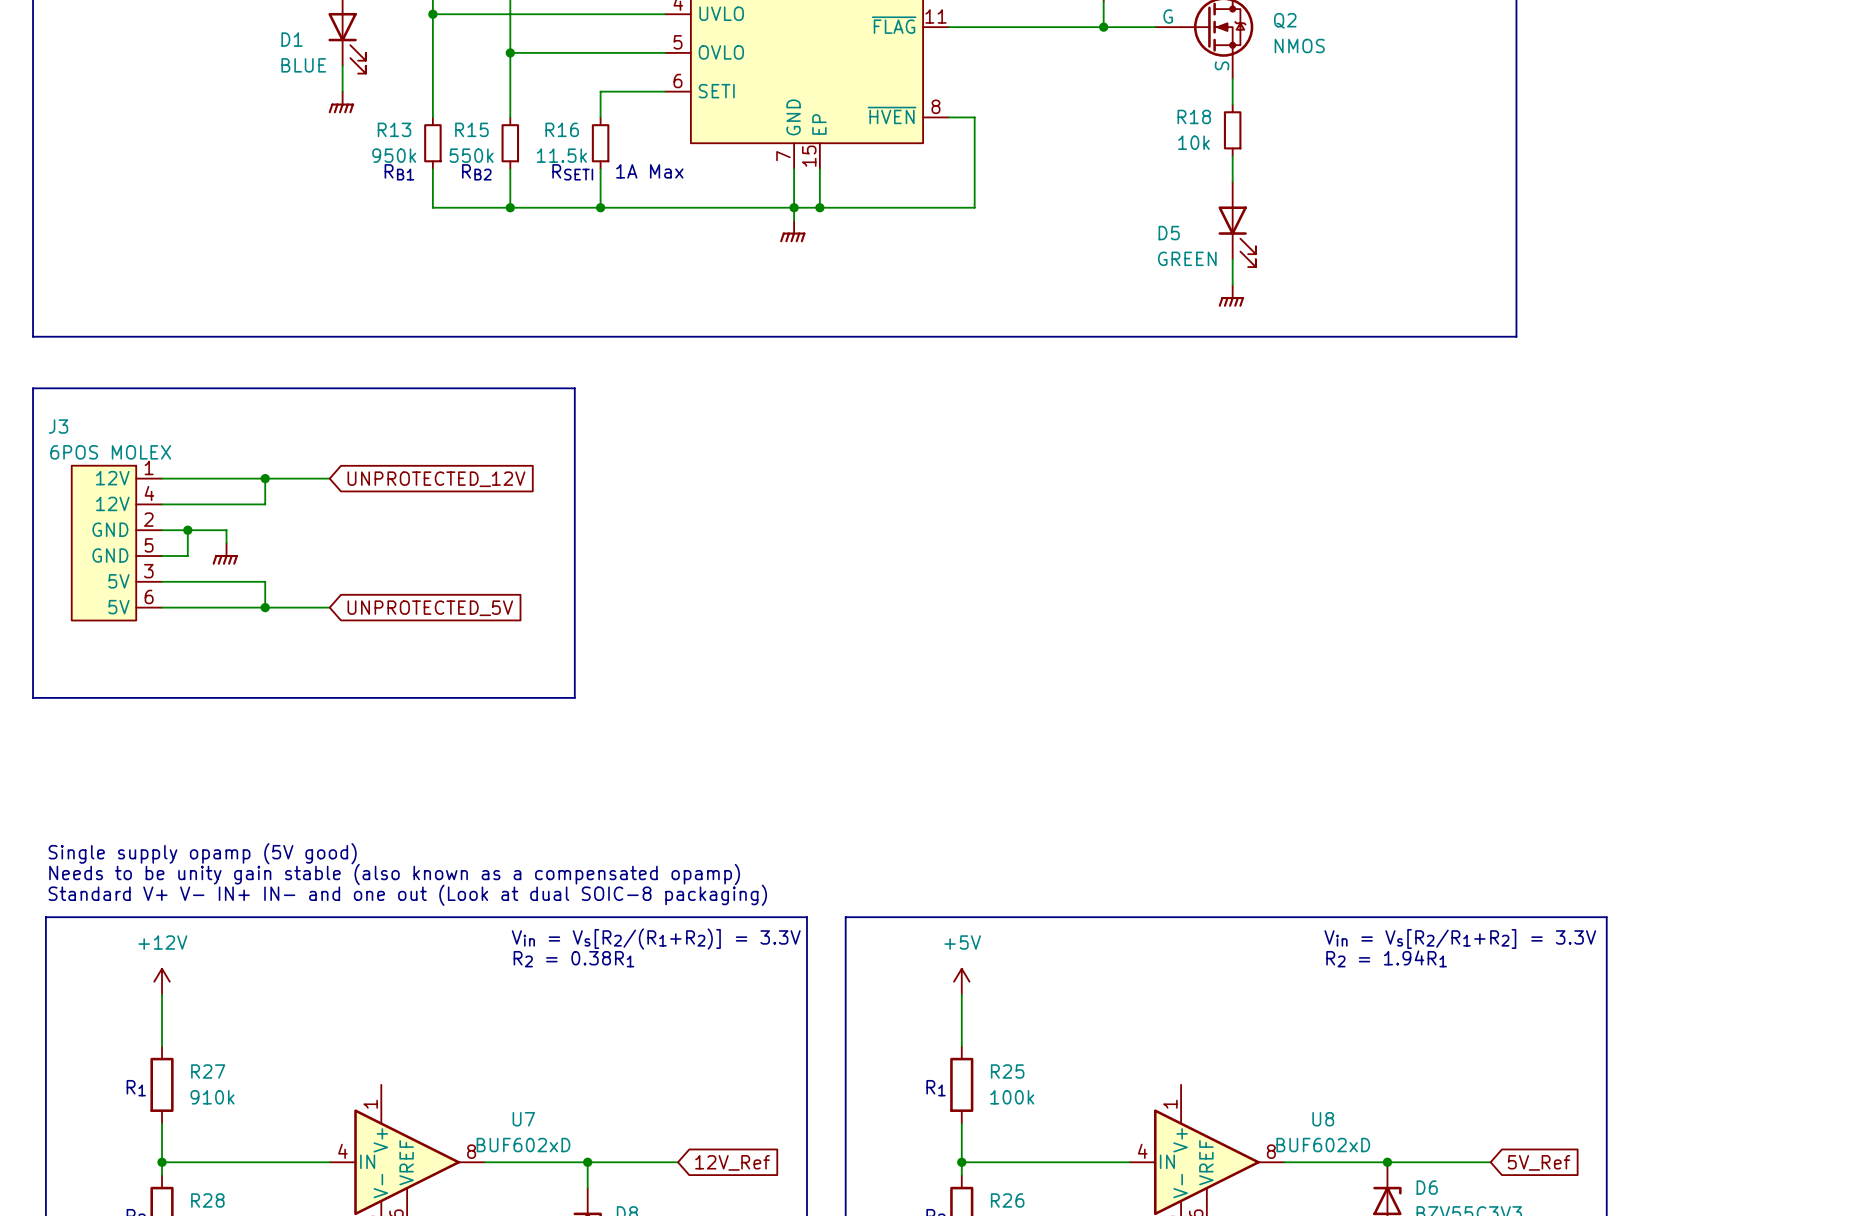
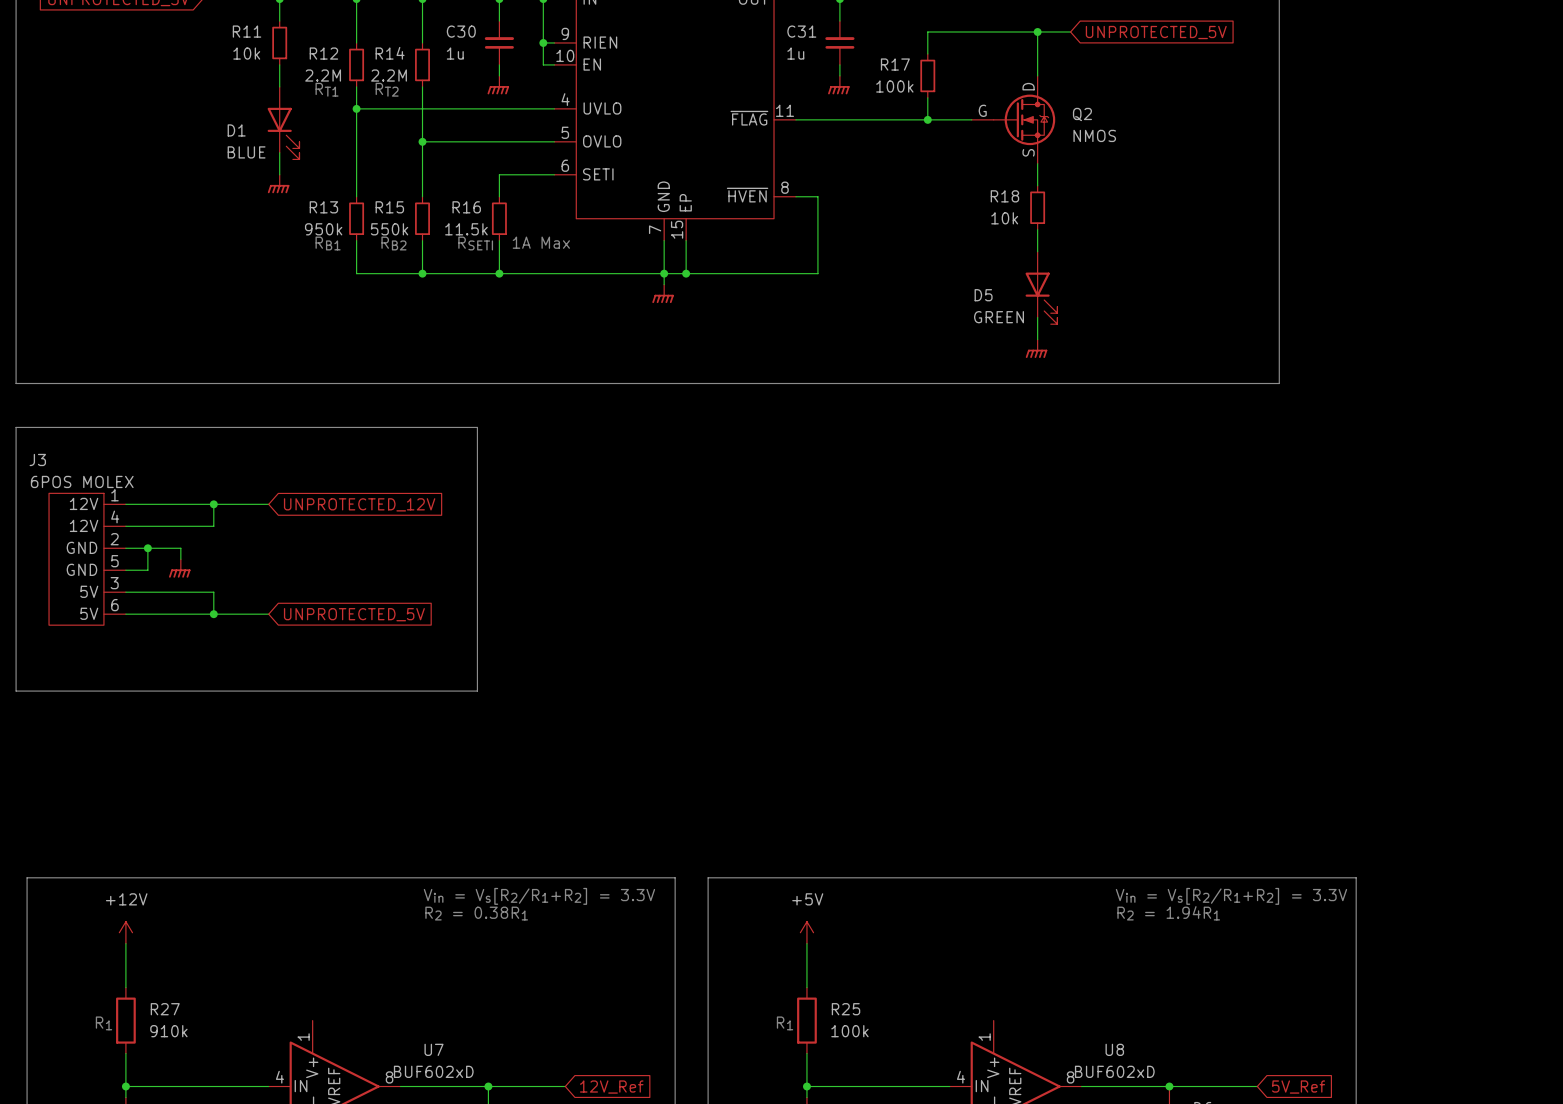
text: Single supply opamp (5V good) (202, 853) -> none
text: Needs to be unity gain stable (also known as a compensated opamp) (394, 874) -> none
text: Standard V+ V- IN+ IN- and one out (Look at dual SOIC-8 packaging) (407, 895) -> none
text: Vin = Vs[R2/(R1+R2)] = 3.3V (656, 938) -> Vin = Vs[R2/R1+R2] = 3.3V (539, 896)

